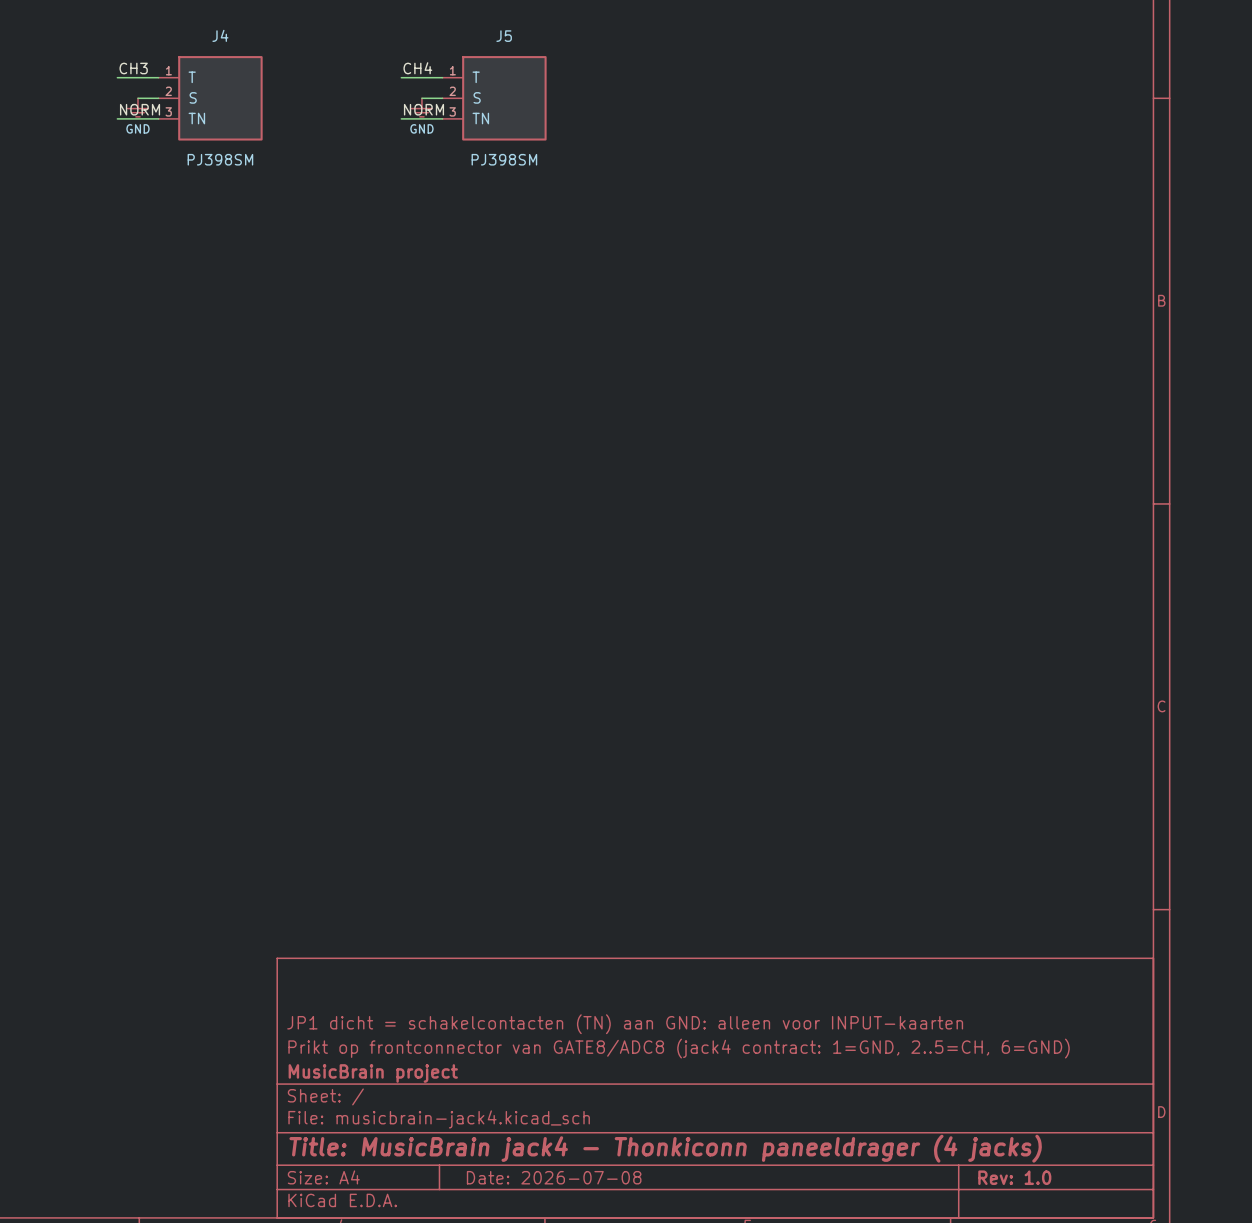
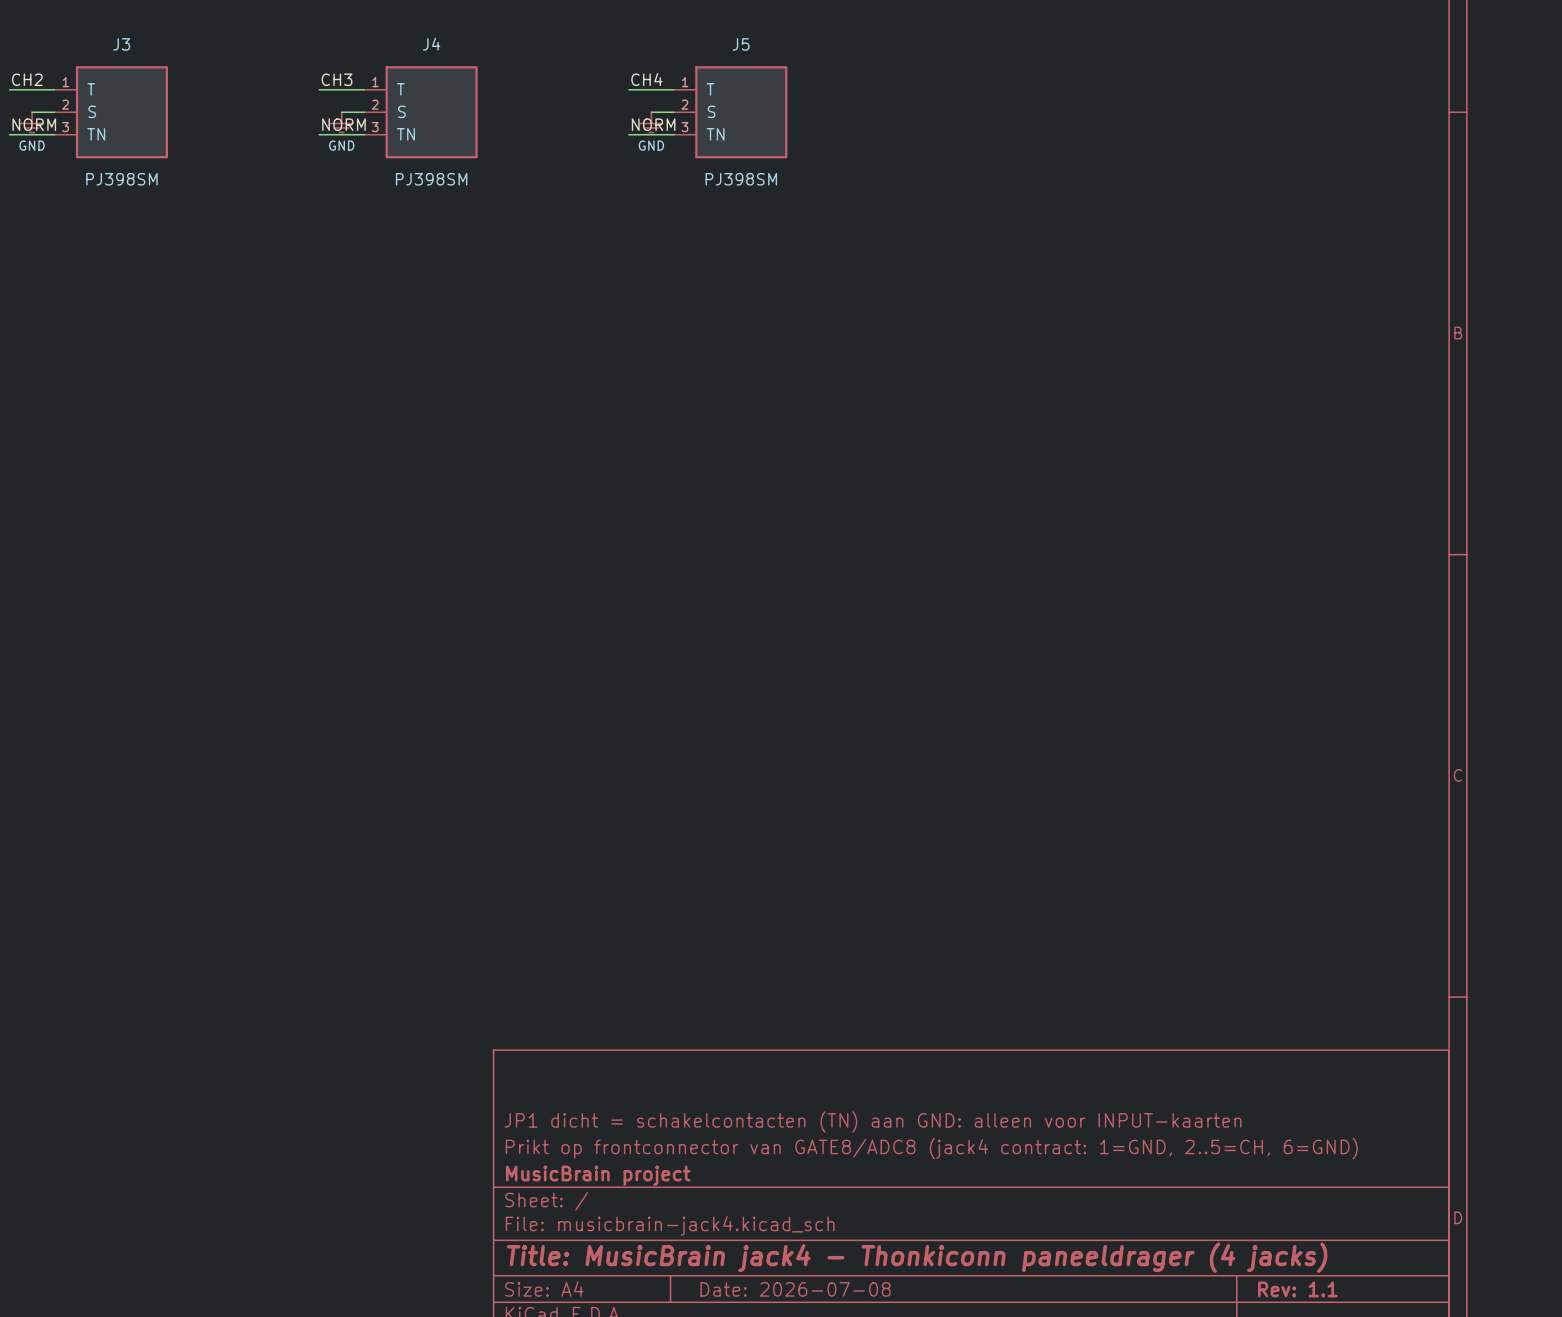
title block: Rev: 1.0 (1014, 1177) -> Rev: 1.1 (1297, 1289)

